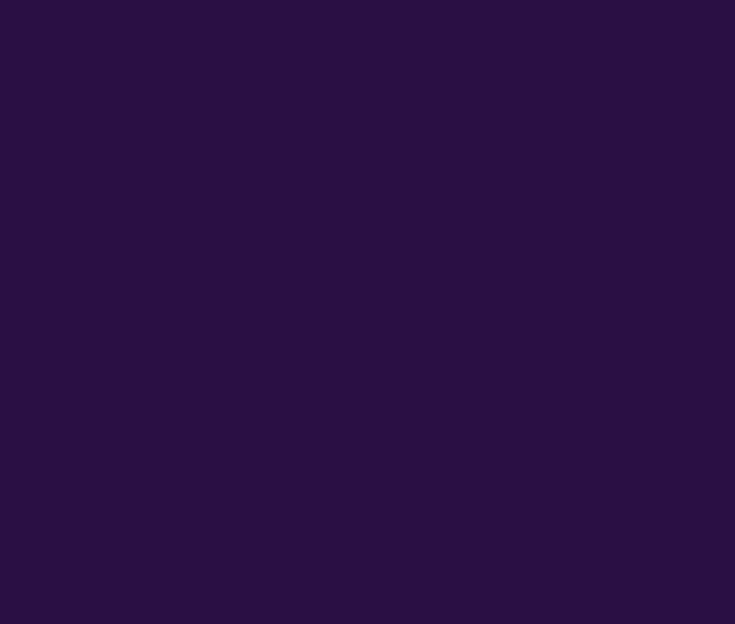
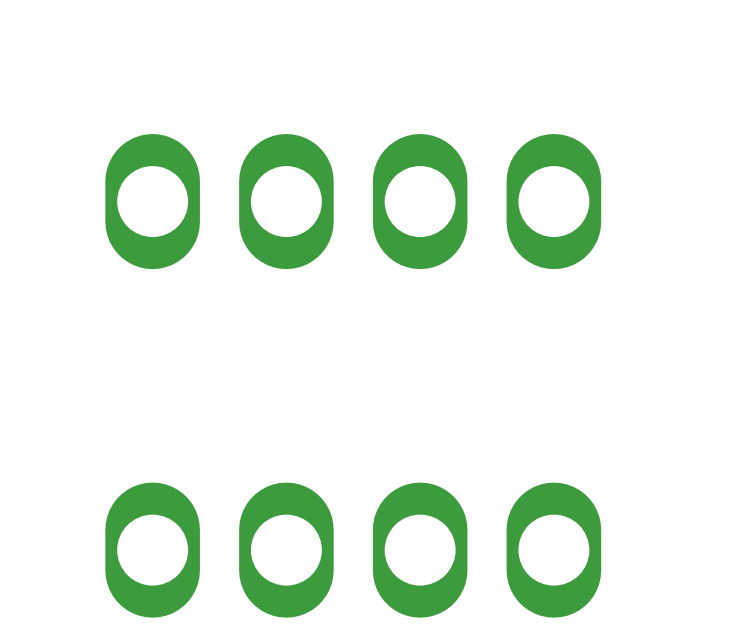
part: none -> (353, 201)
part: none -> (353, 550)

